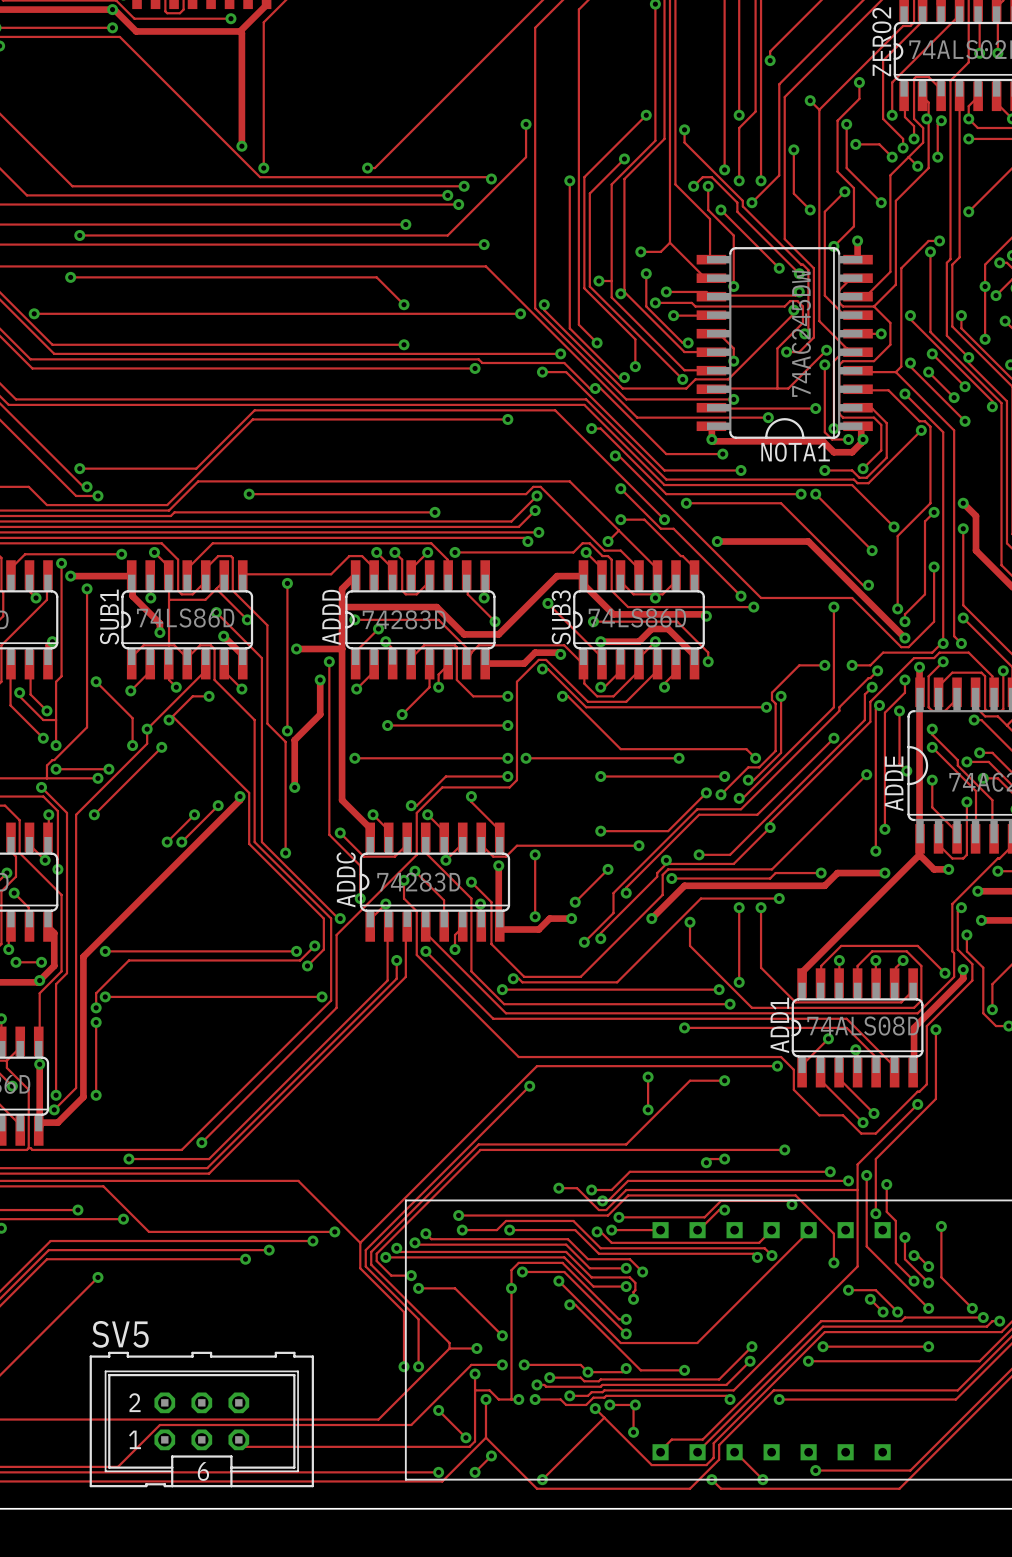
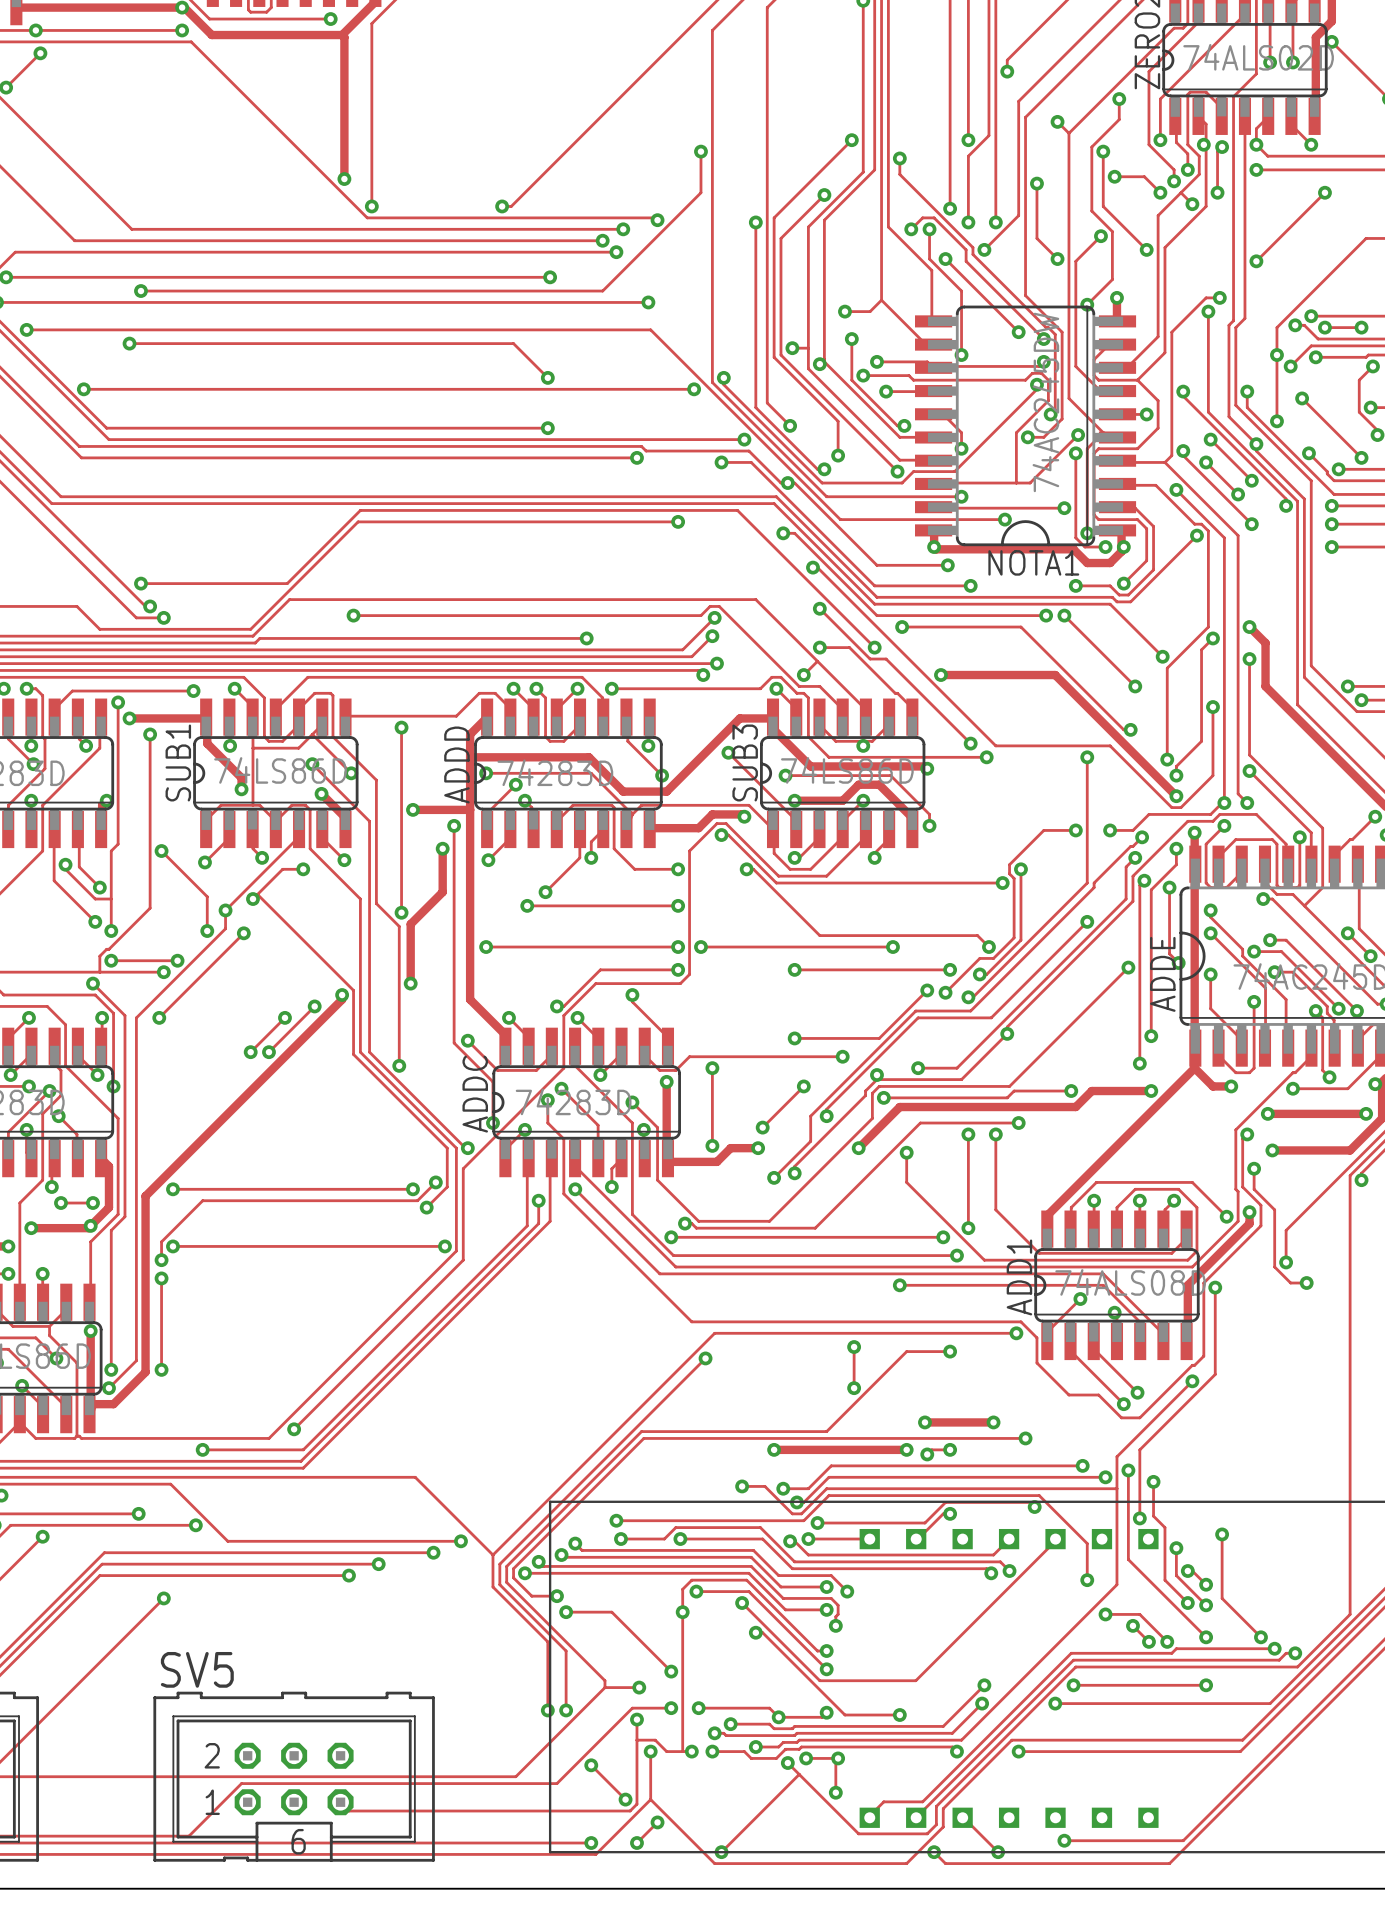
track: none -> (924, 1422) (993, 1422)
via: none -> (924, 1422)
via: none -> (993, 1422)
track: none -> (774, 1449) (906, 1449)
via: none -> (774, 1449)
via: none -> (906, 1449)

